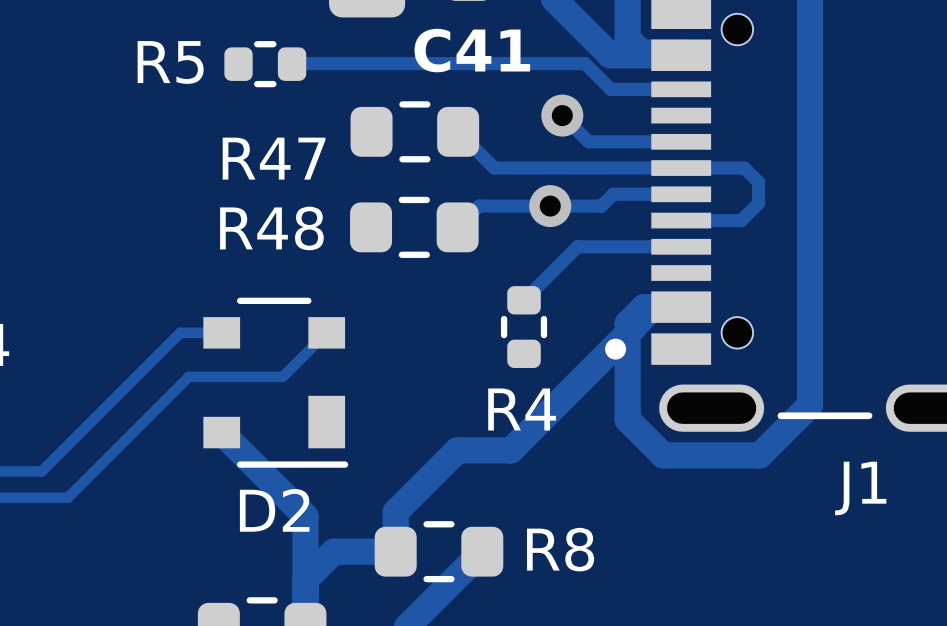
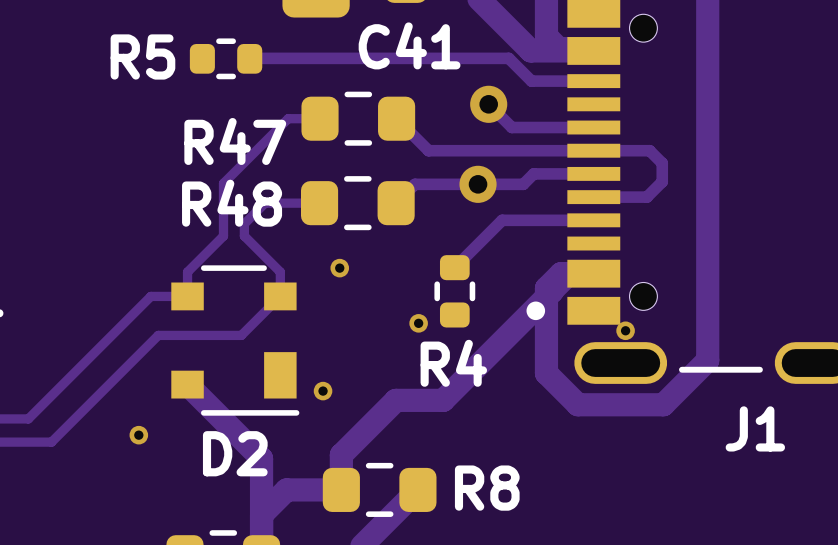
track: none -> (320, 118) (288, 118) (223, 183) (223, 236) (187, 272) (187, 296)
track: none -> (319, 203) (265, 203) (244, 223) (244, 236) (280, 272) (280, 296)
via: none -> (339, 268)
via: none -> (418, 323)
via: none -> (625, 330)
via: none -> (323, 391)
via: none -> (138, 435)

